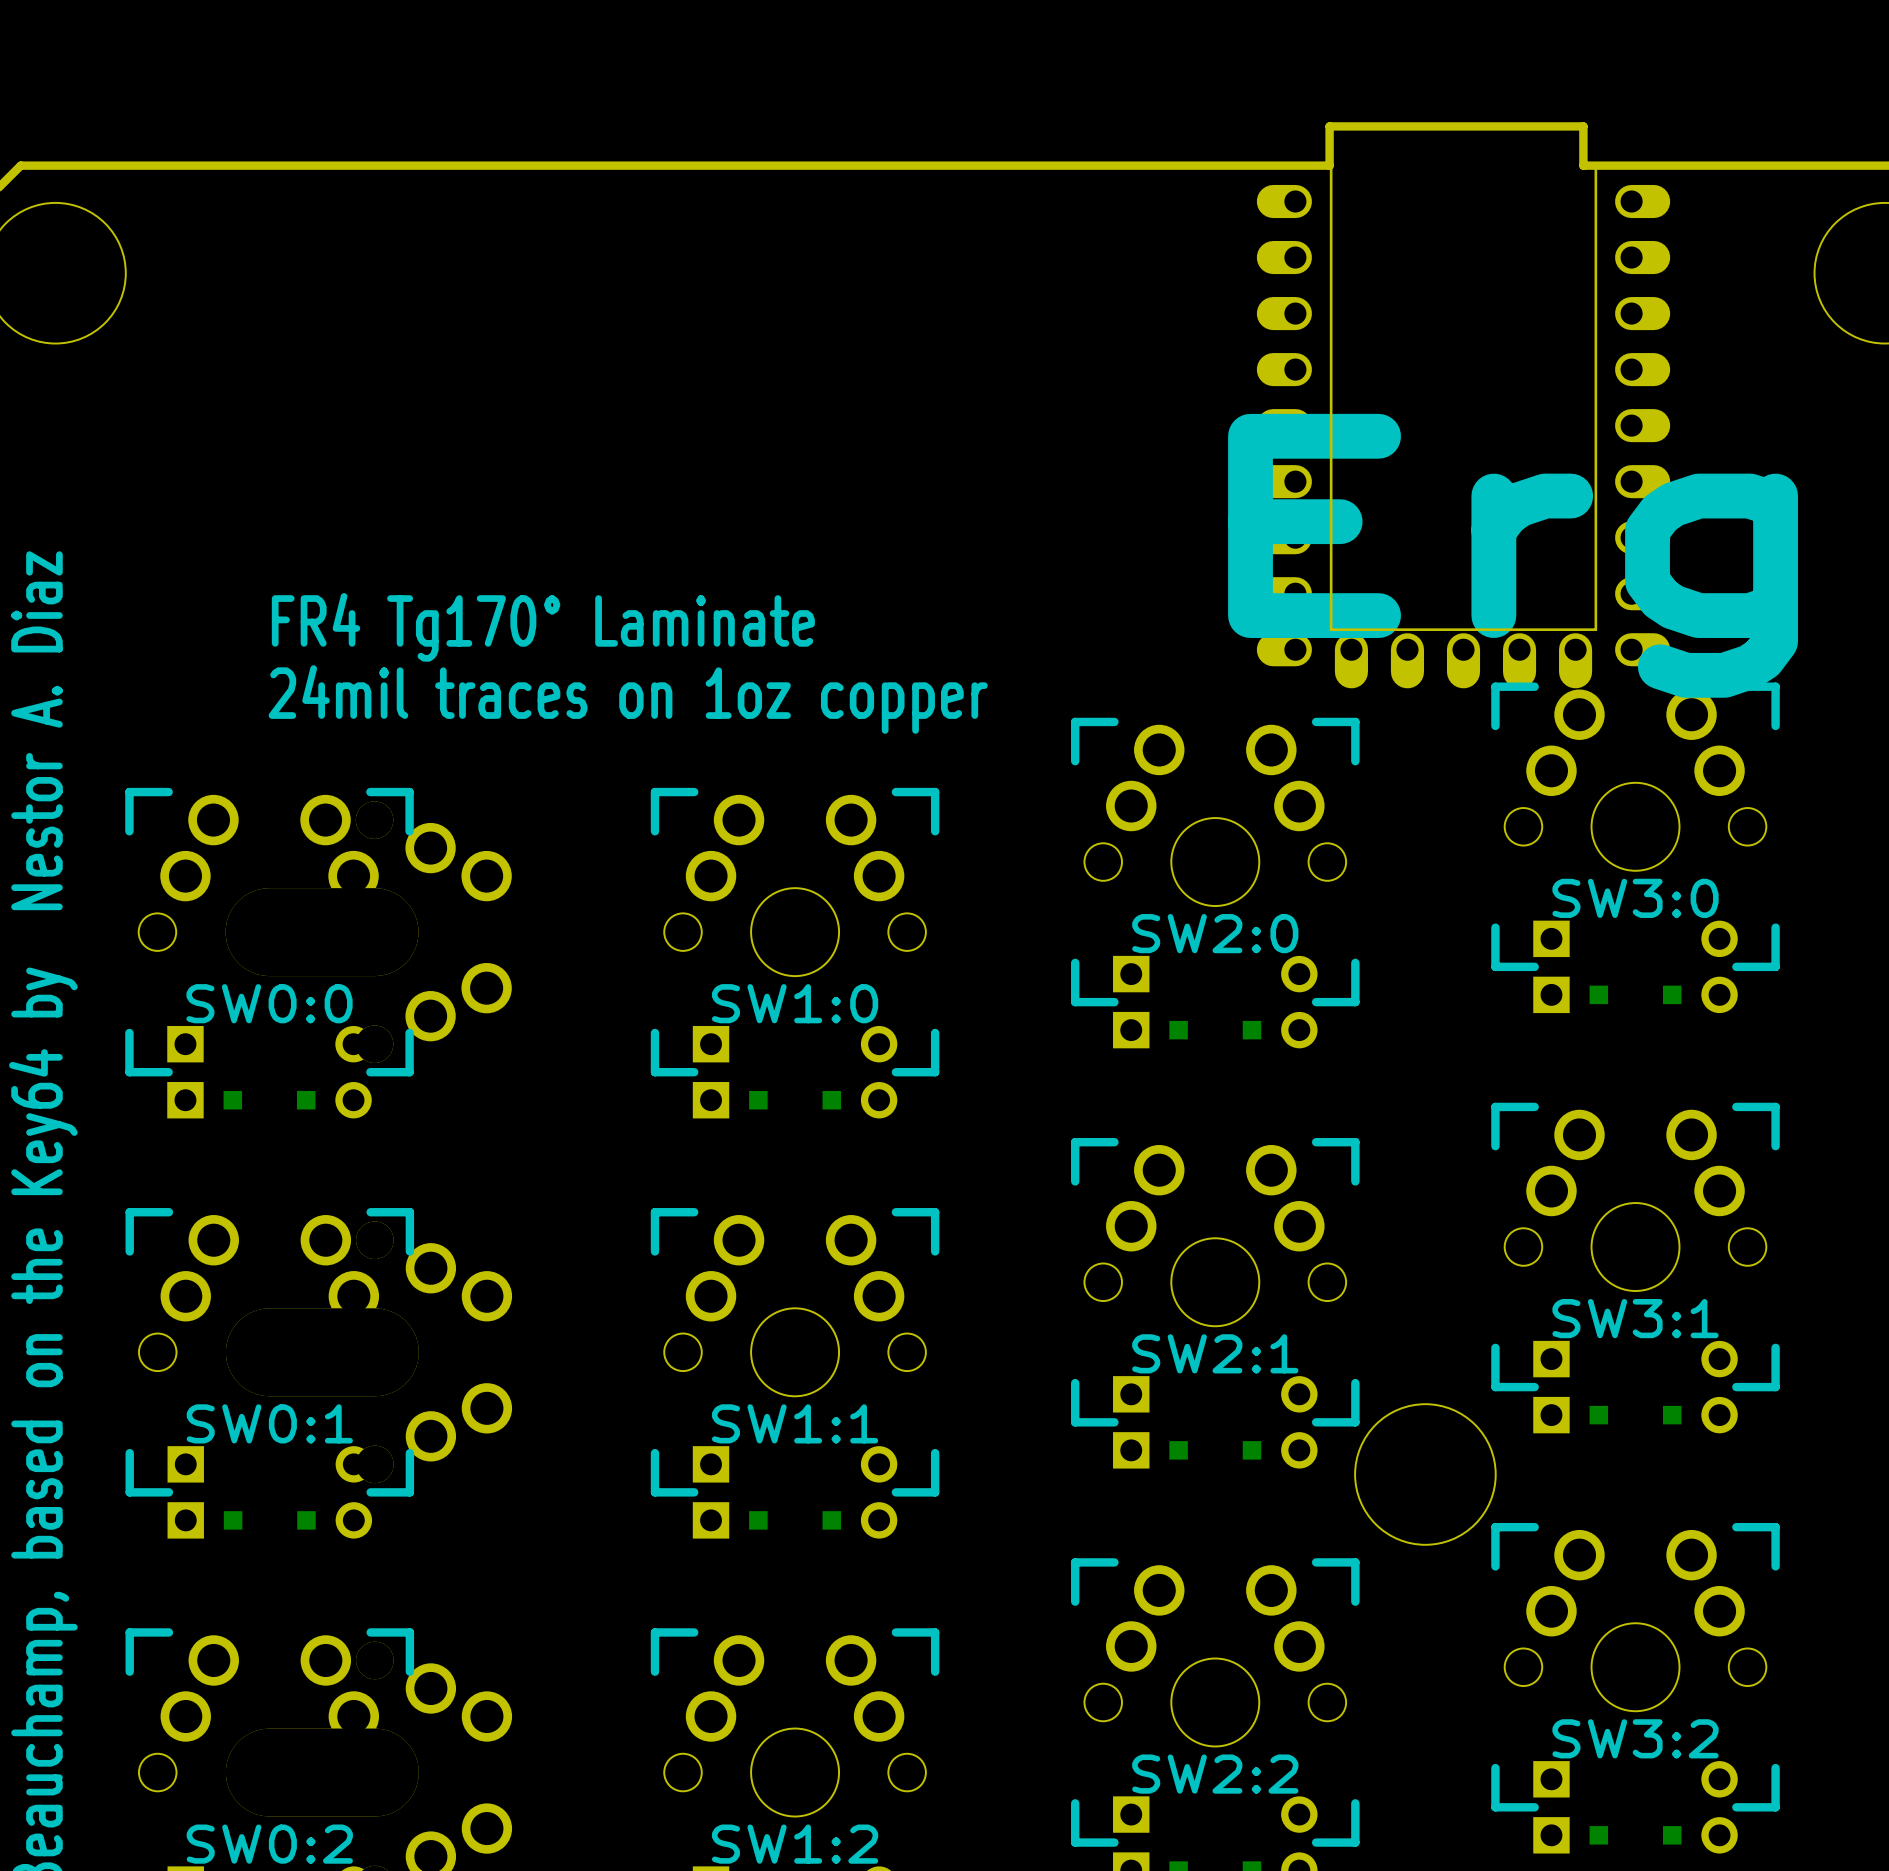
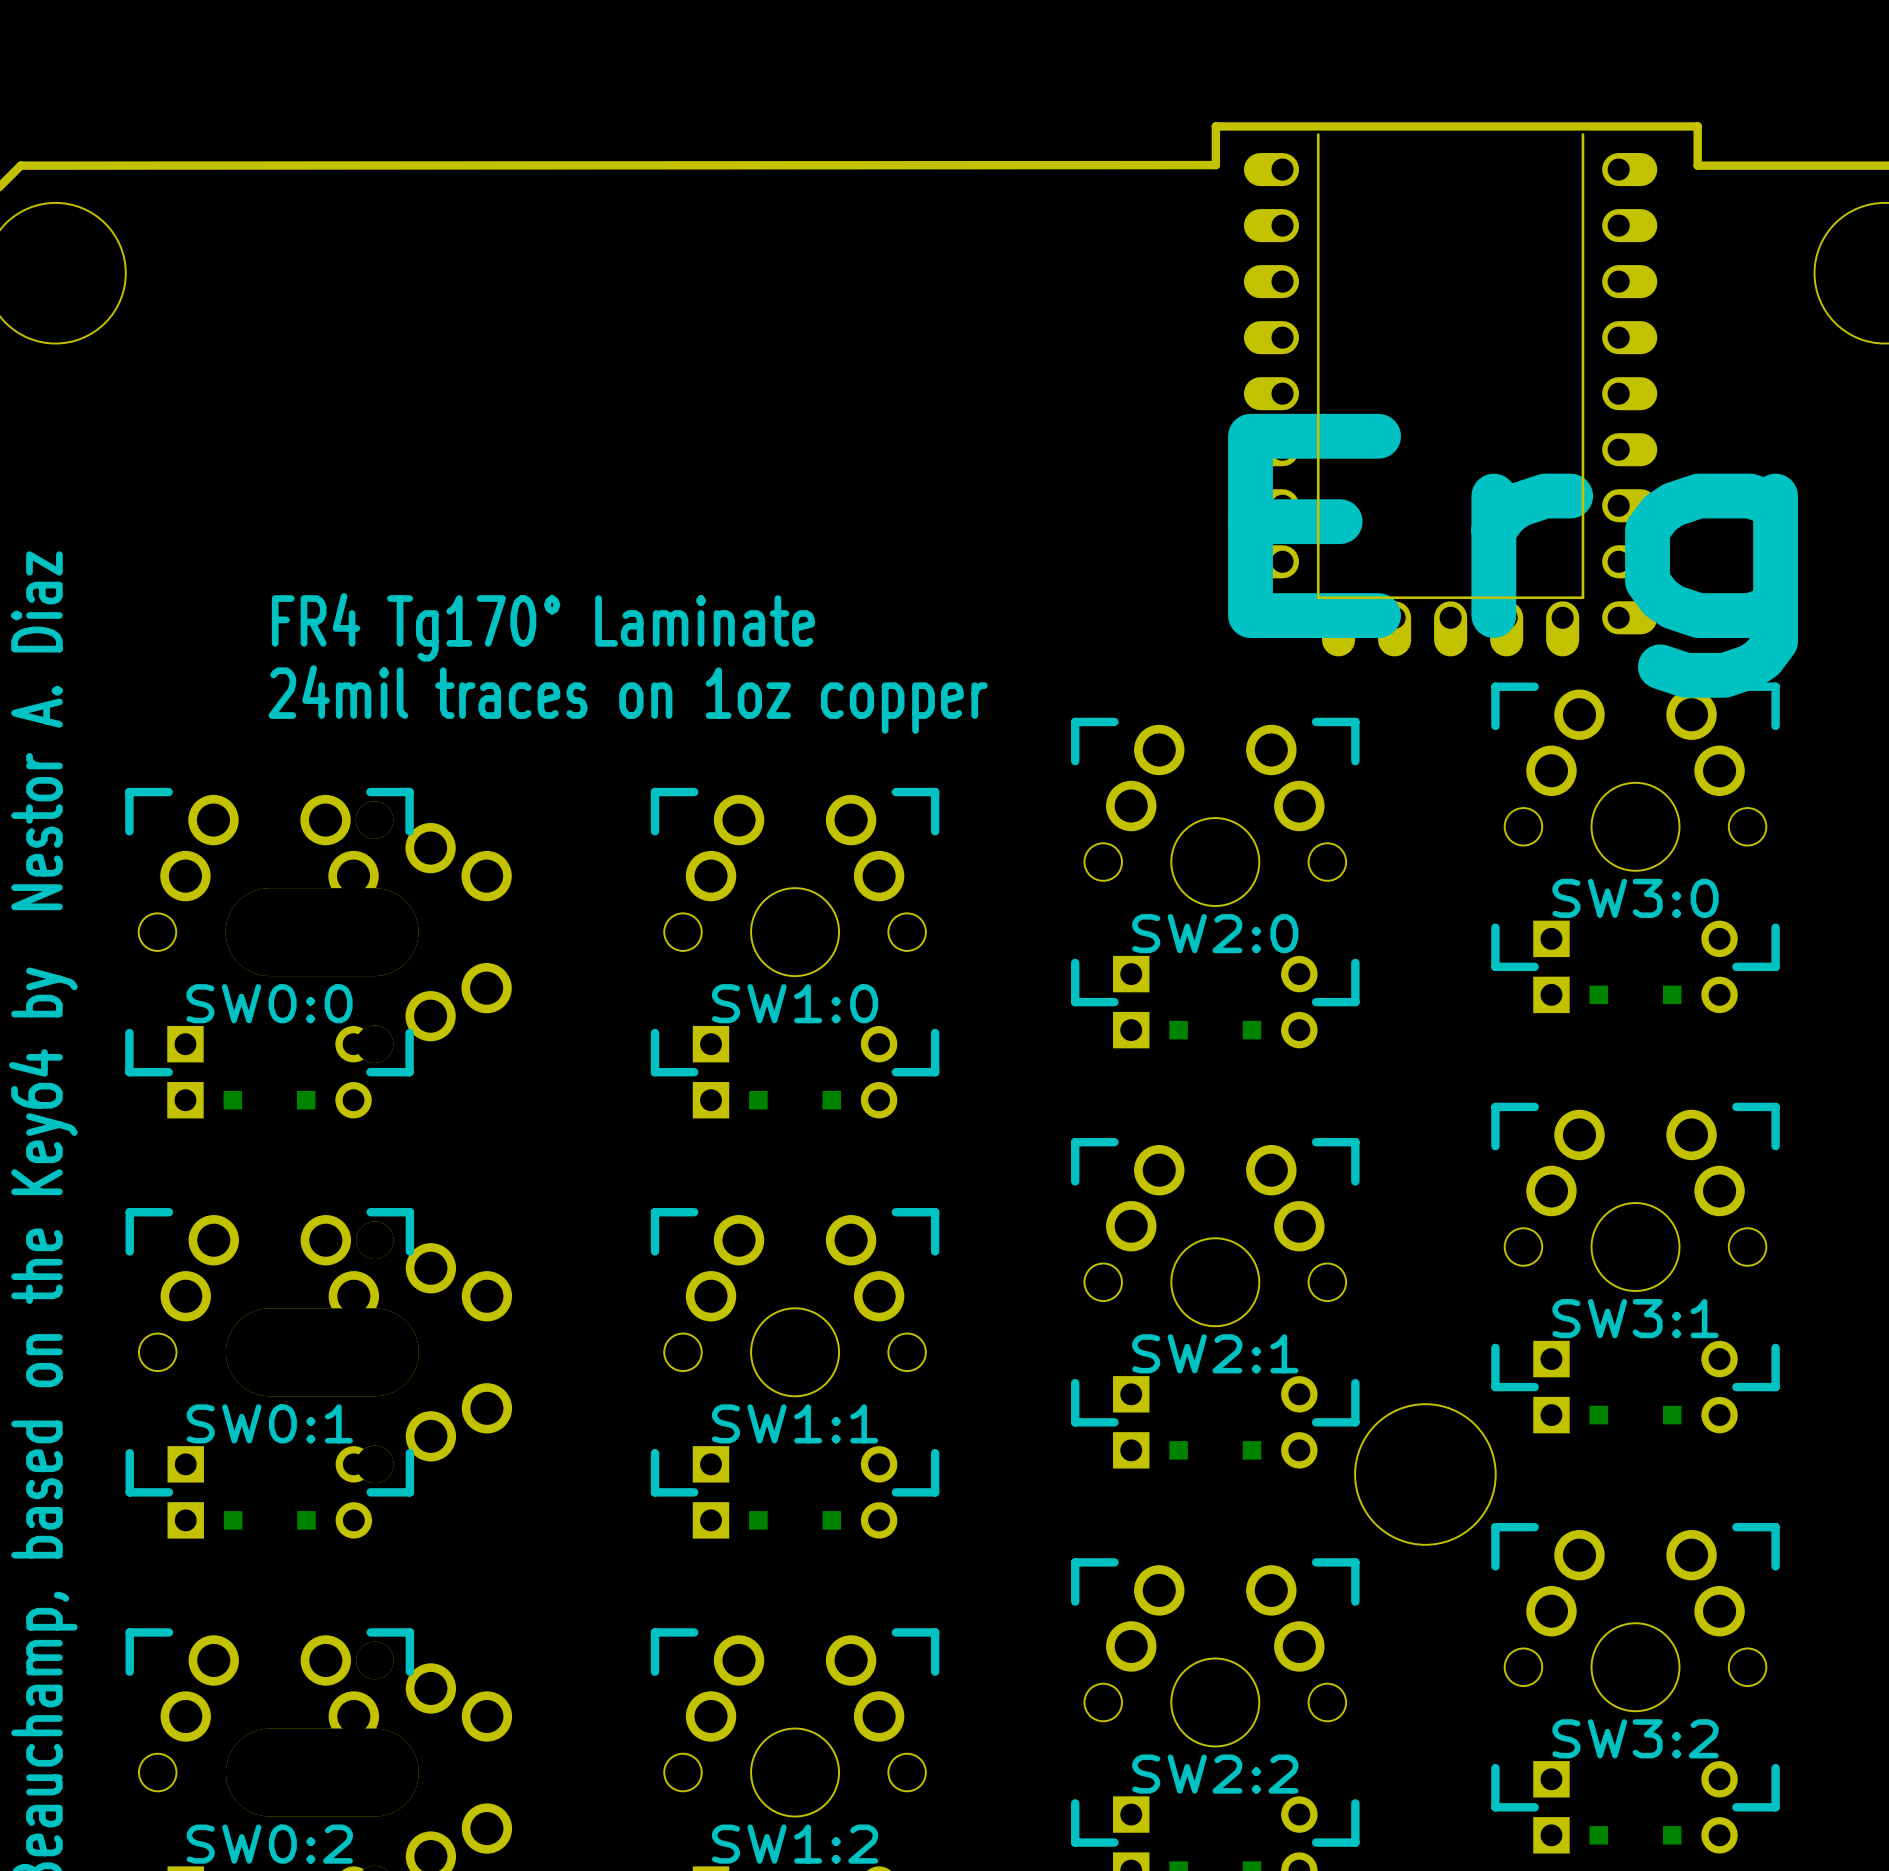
board edge: (1329, 126) (1329, 165) (20, 165) -> (1329, 126) (1215, 126) (1215, 165) (20, 165)
board edge: (1583, 126) (1583, 165) (1697, 165) -> (1583, 126) (1697, 126) (1697, 165)
part position: (1463, 426) -> (1450, 394)

